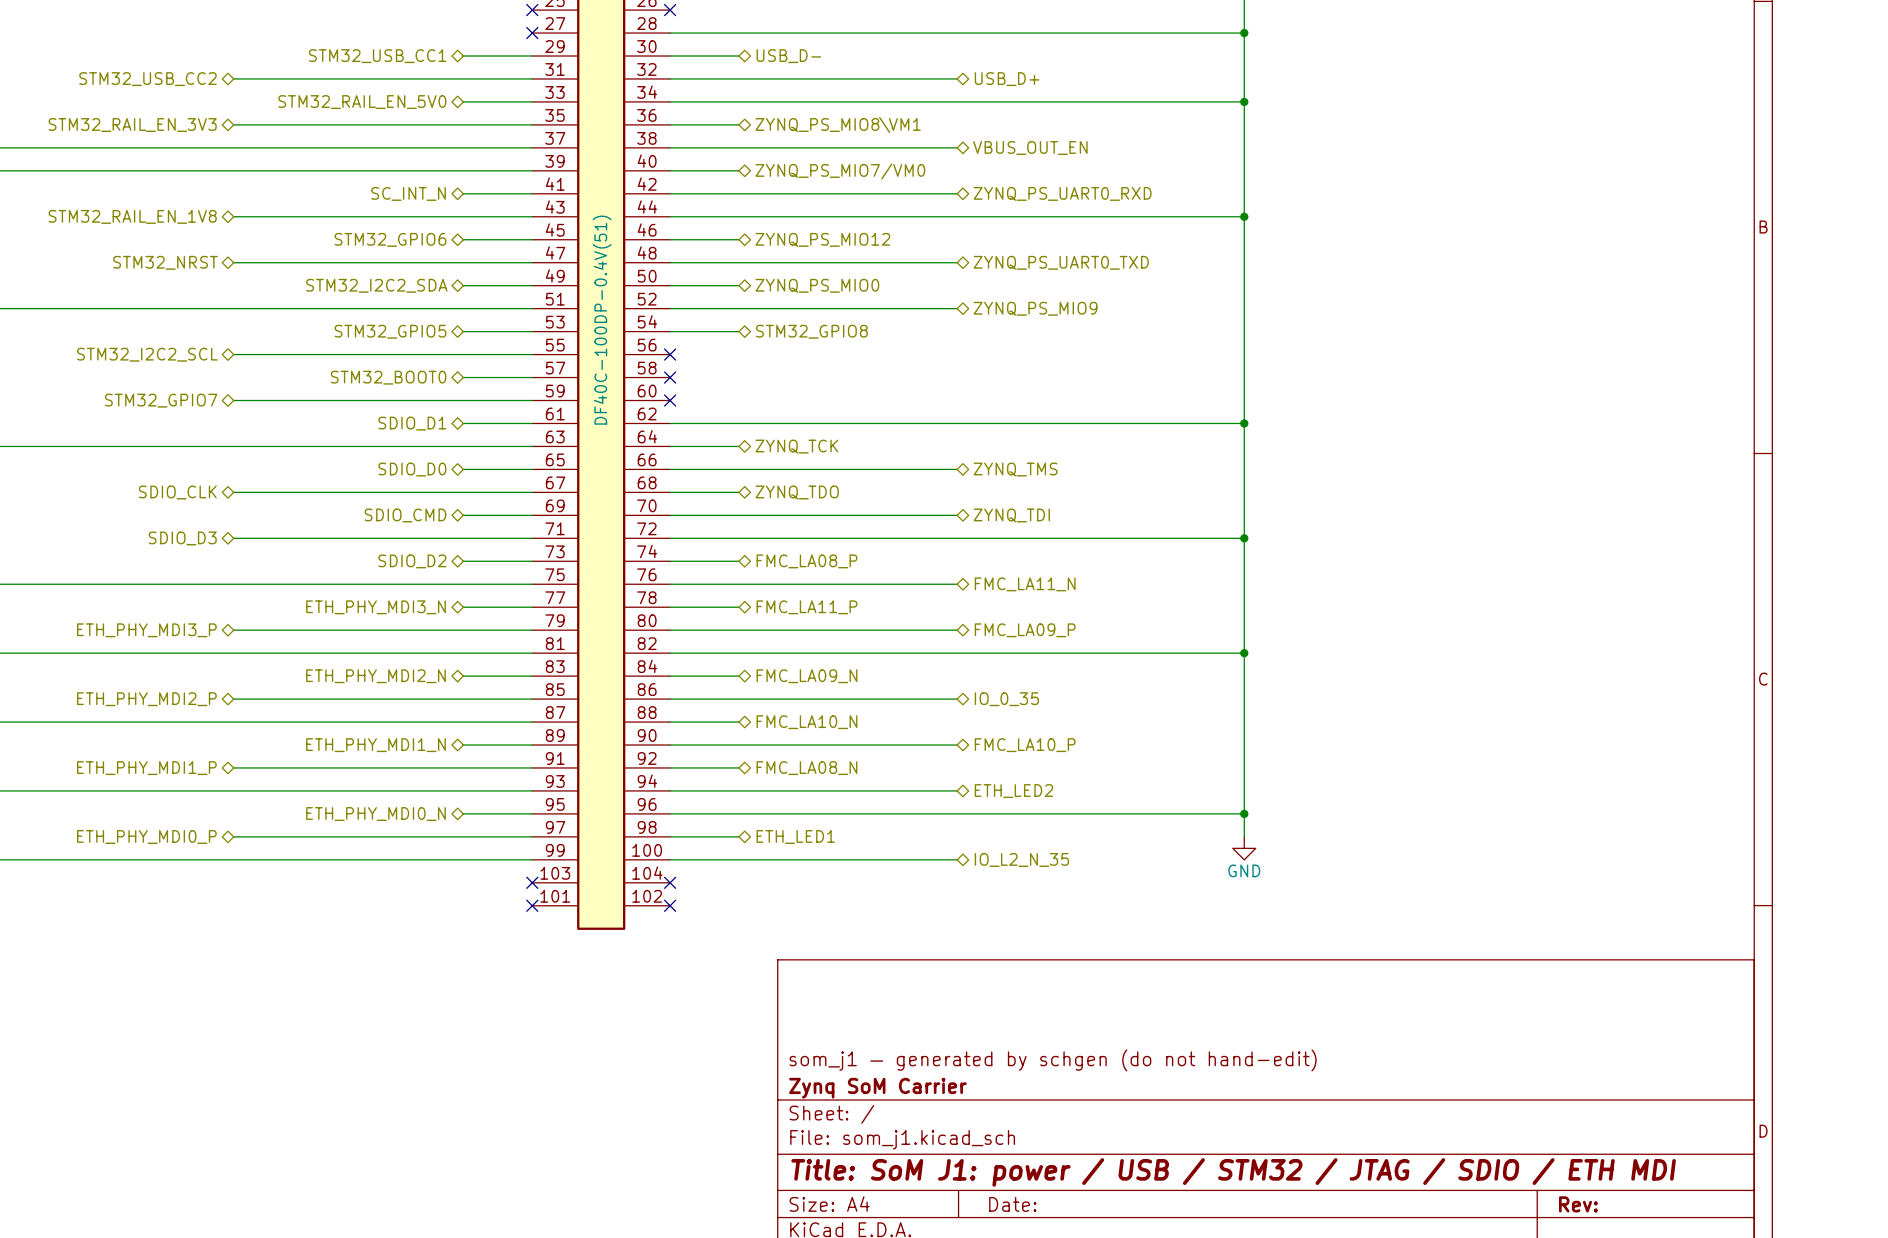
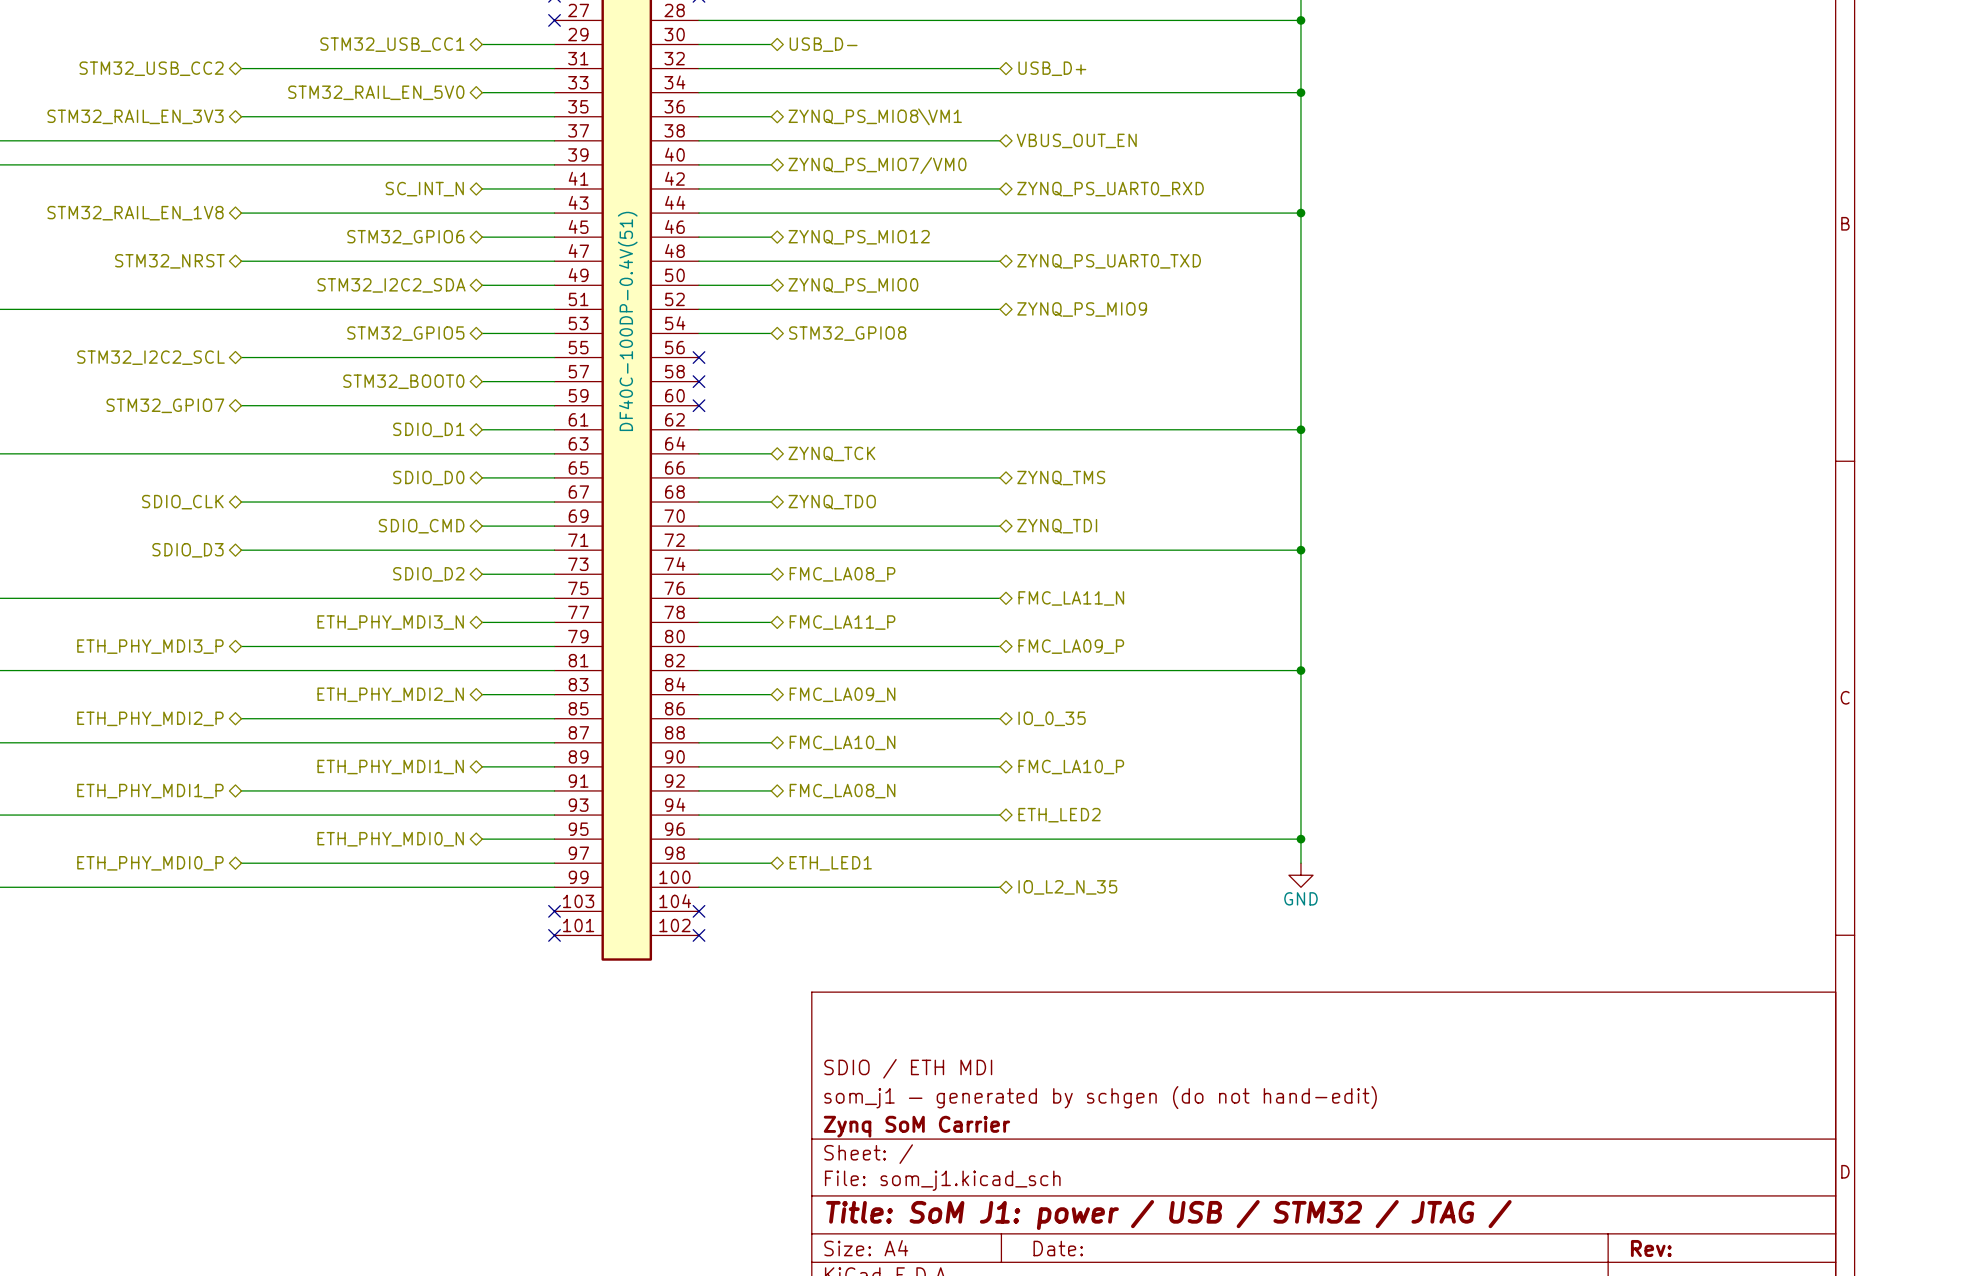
title block: none -> SDIO / ETH MDI (908, 1068)
title block: Title: SoM J1: power / USB / STM32 / JTAG / SDIO / ETH MDI (1233, 1172) -> Title: SoM J1: power / USB / STM32 / JTAG / (1168, 1215)

